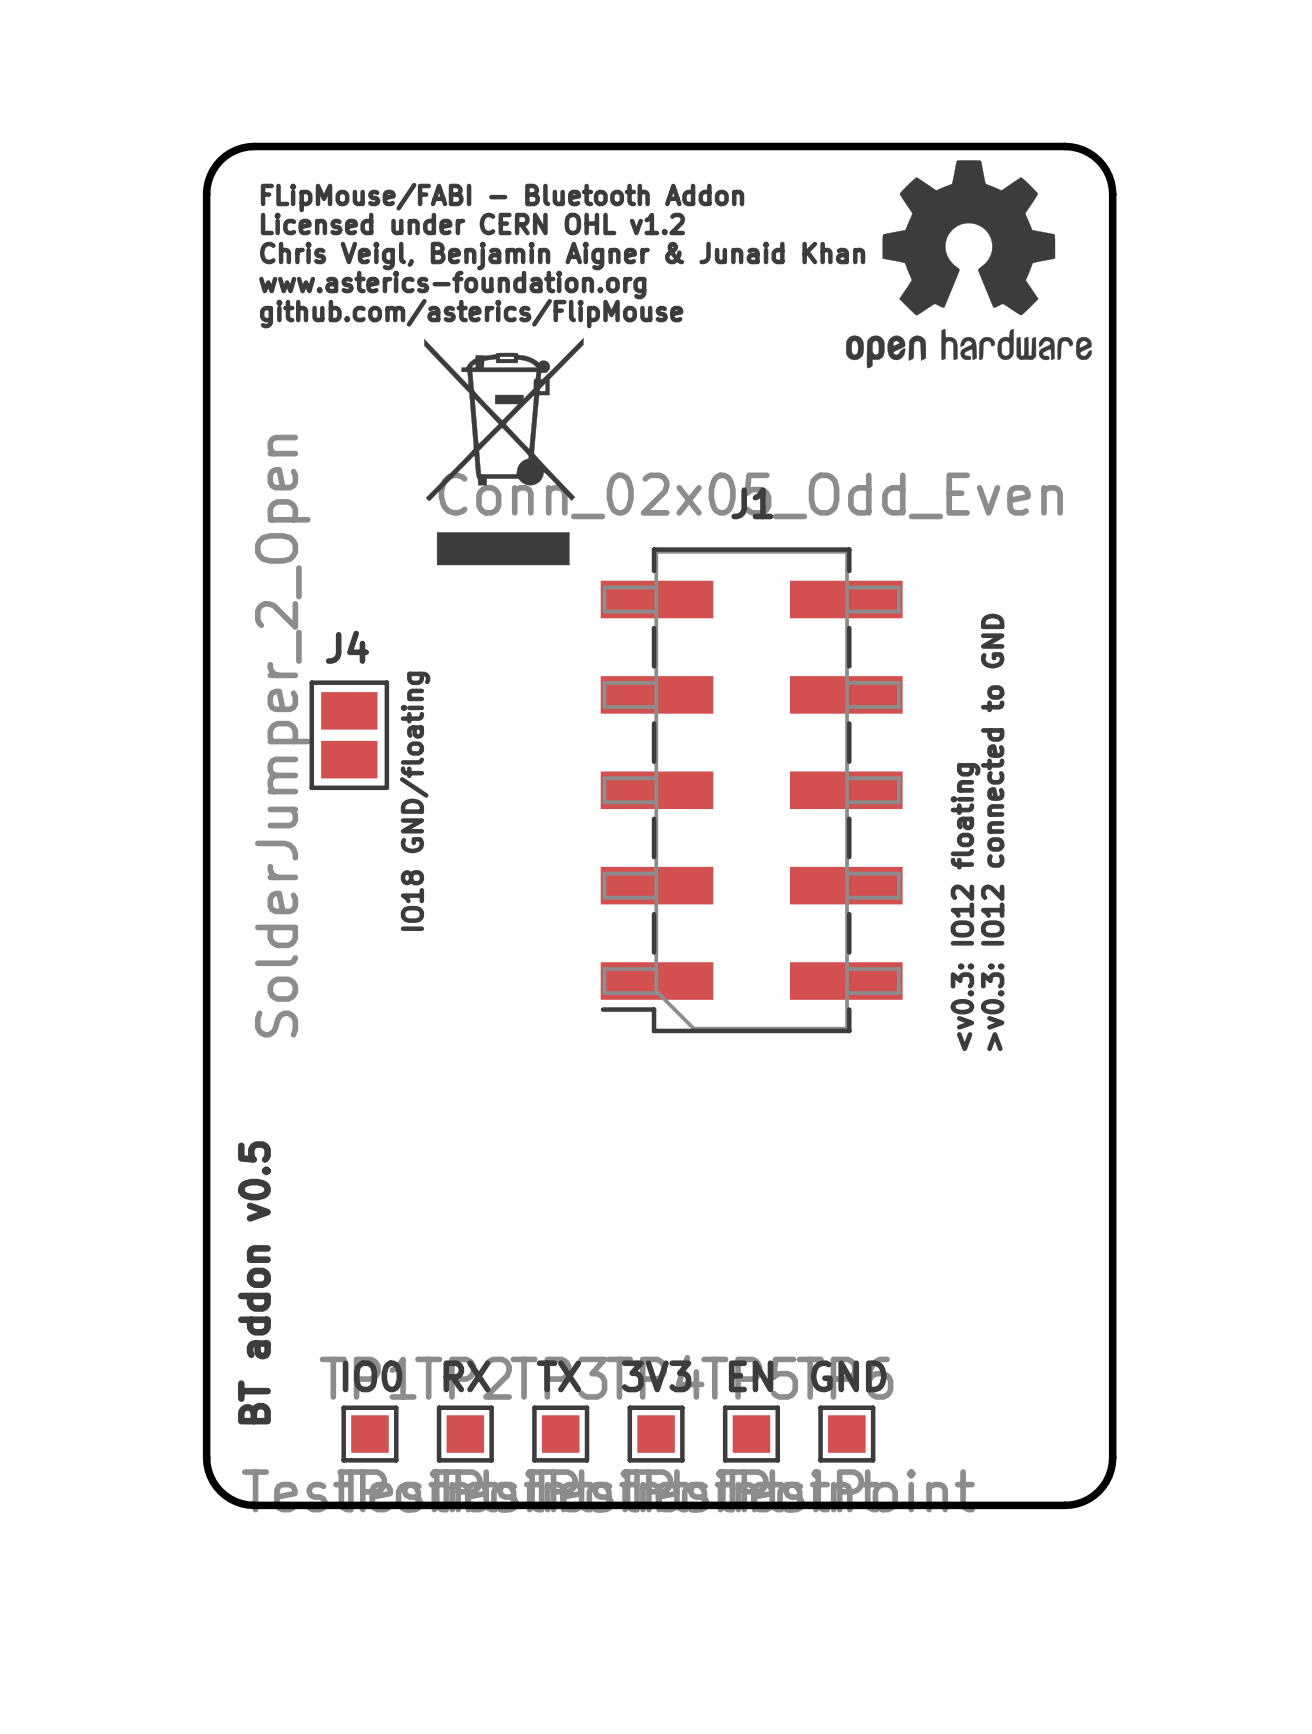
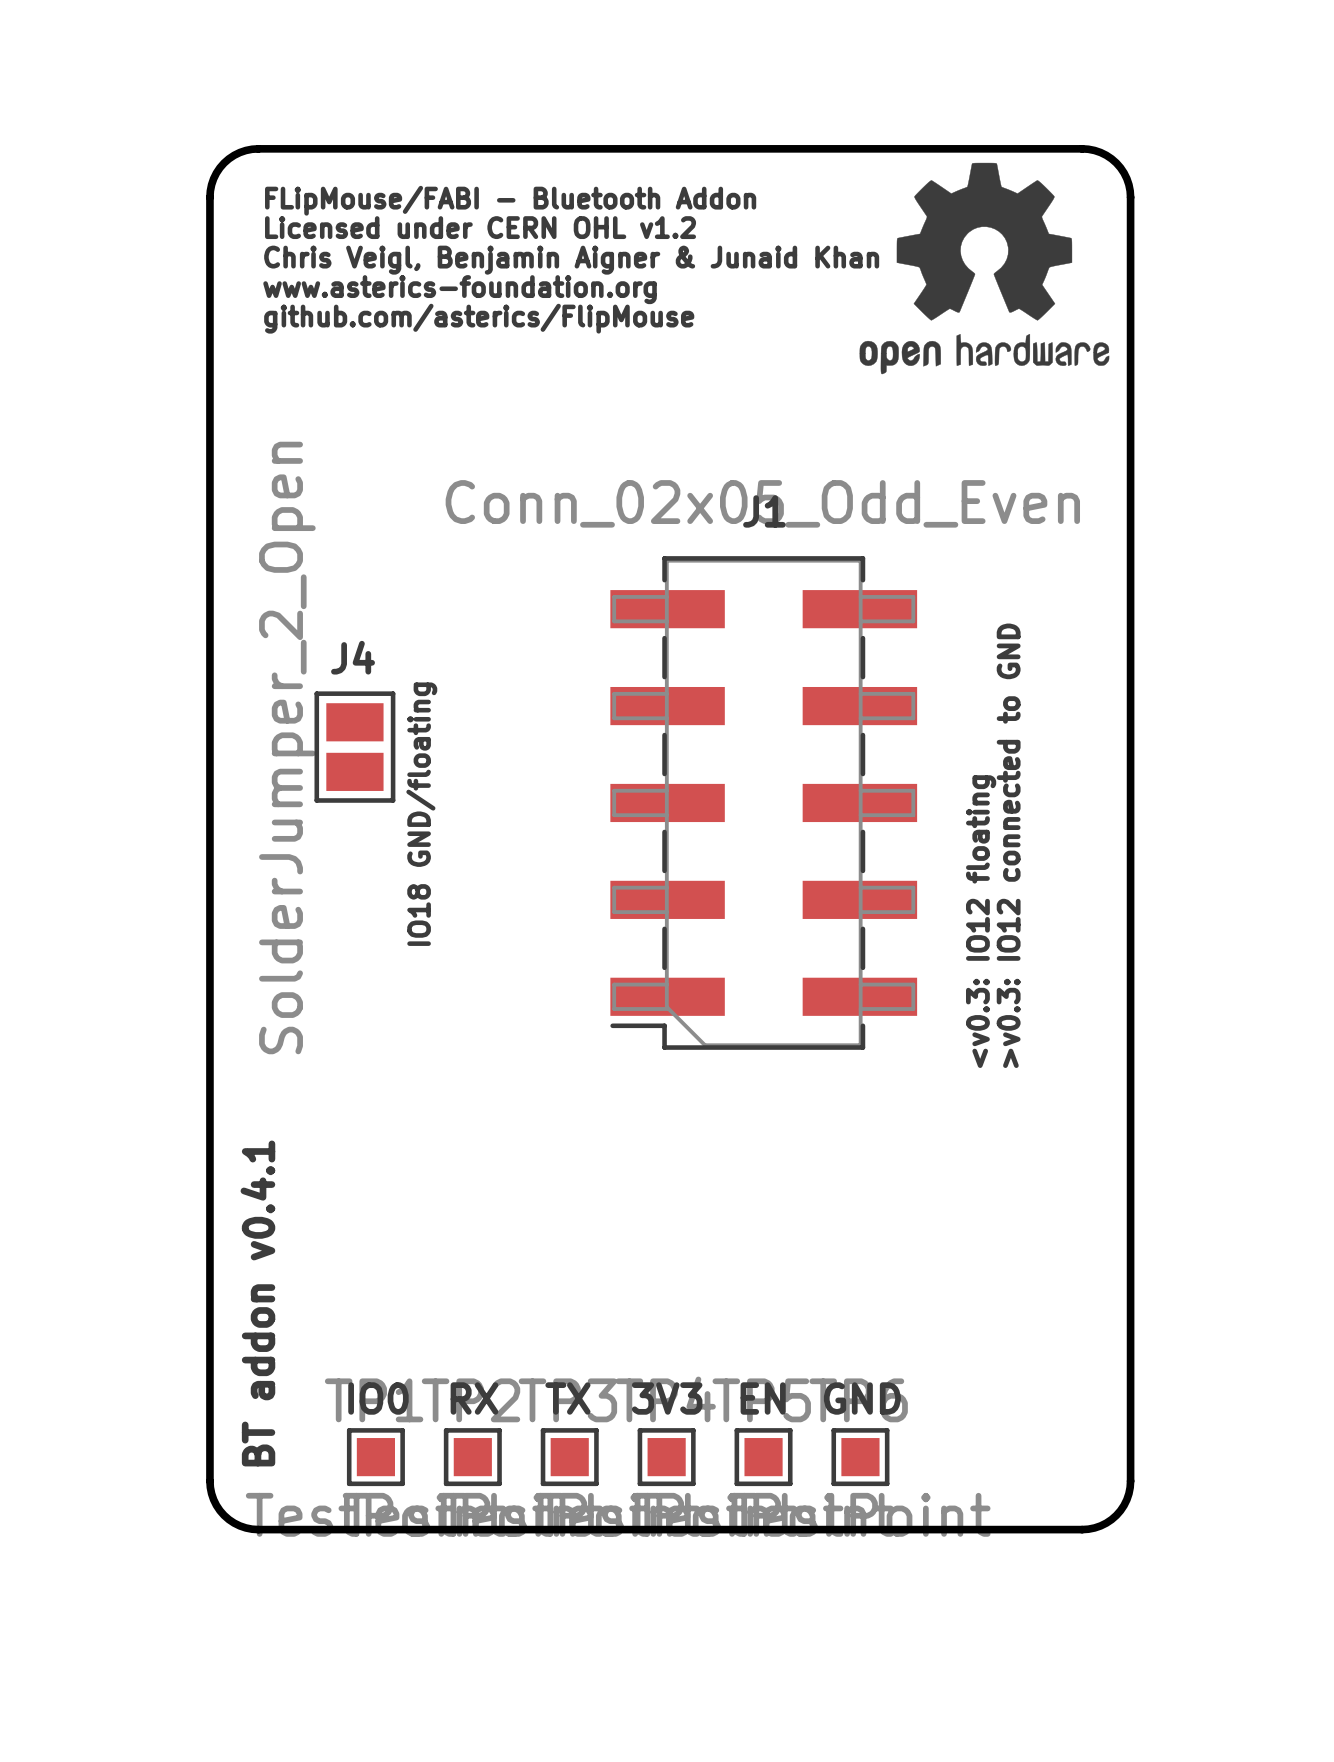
drawing: [424, 338, 584, 566] -> none
text: BT addon v0.5 (254, 1282) -> BT addon v0.4.1 (257, 1303)

